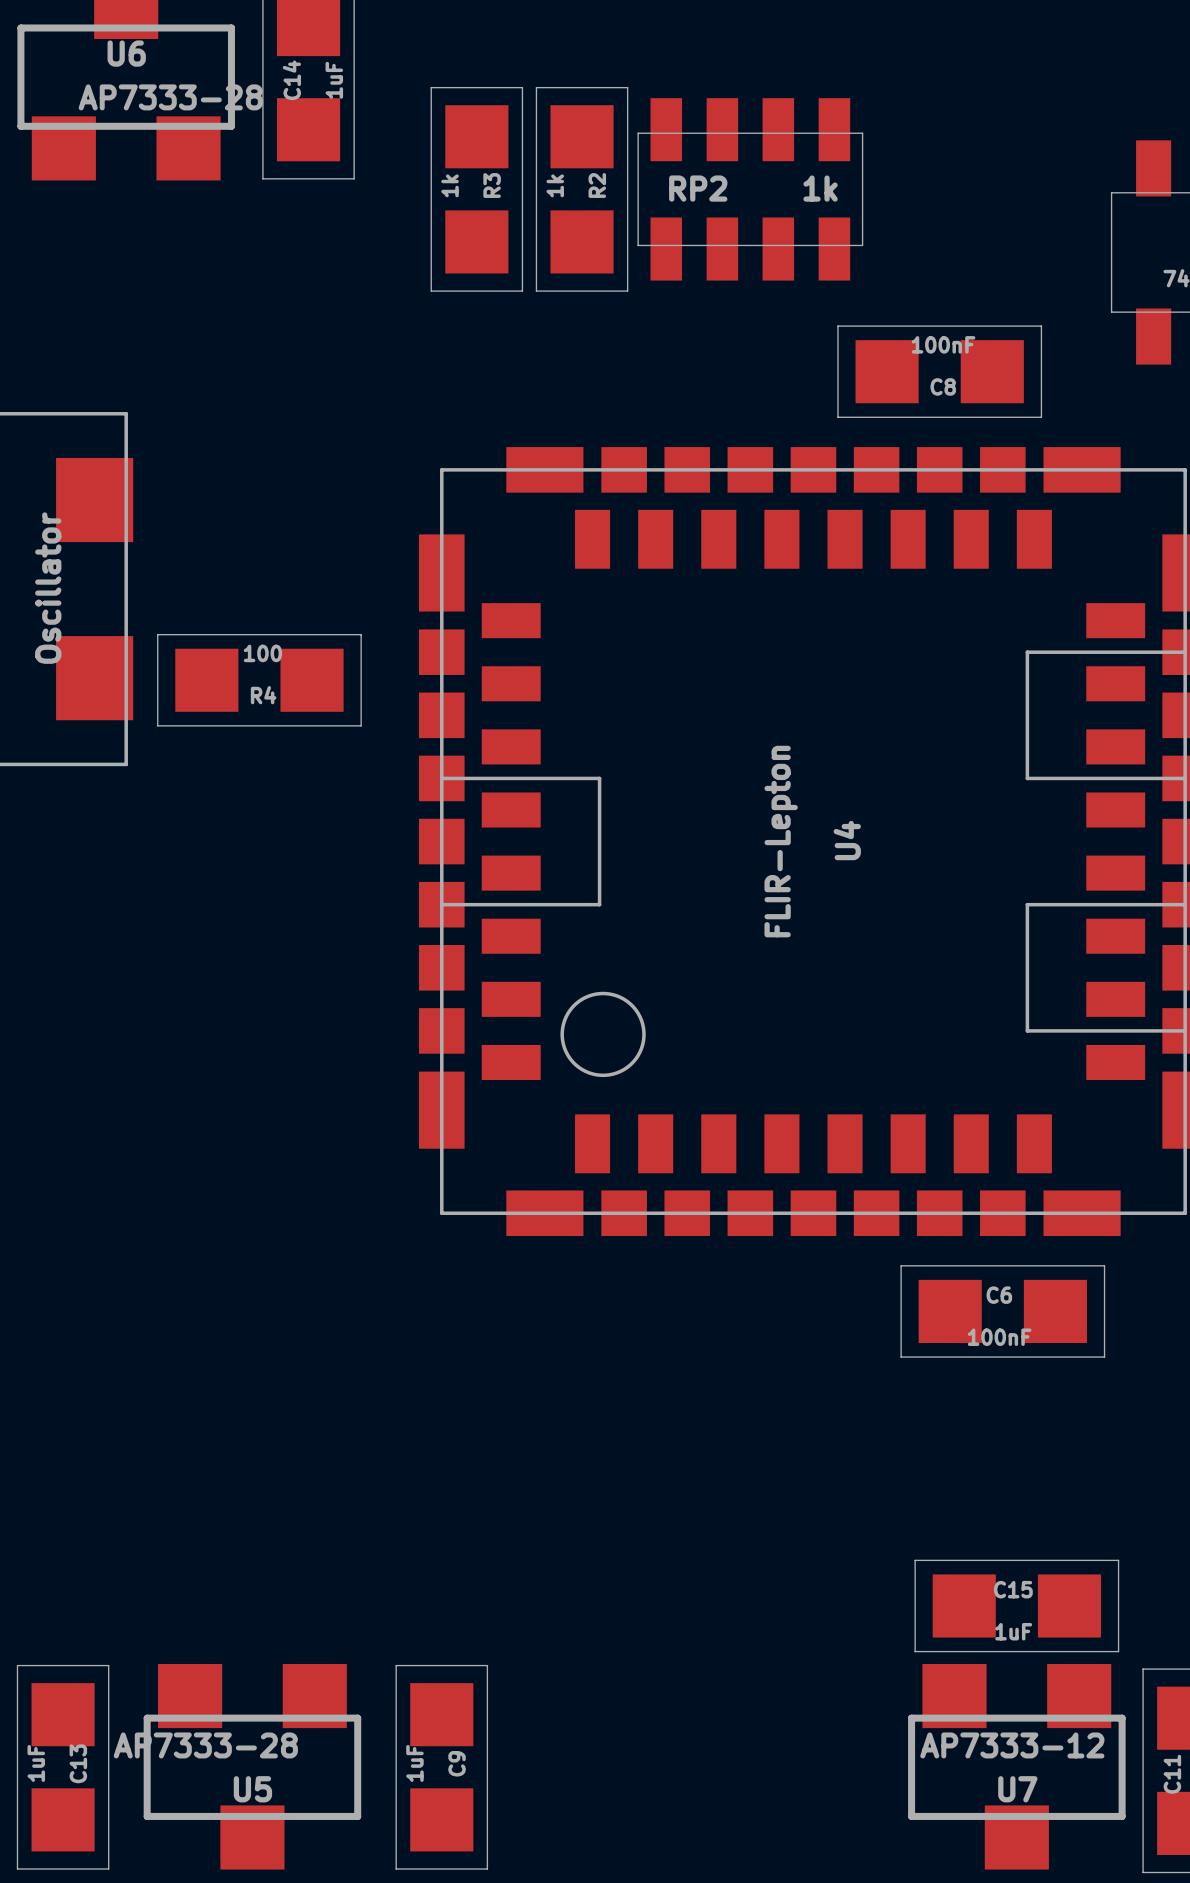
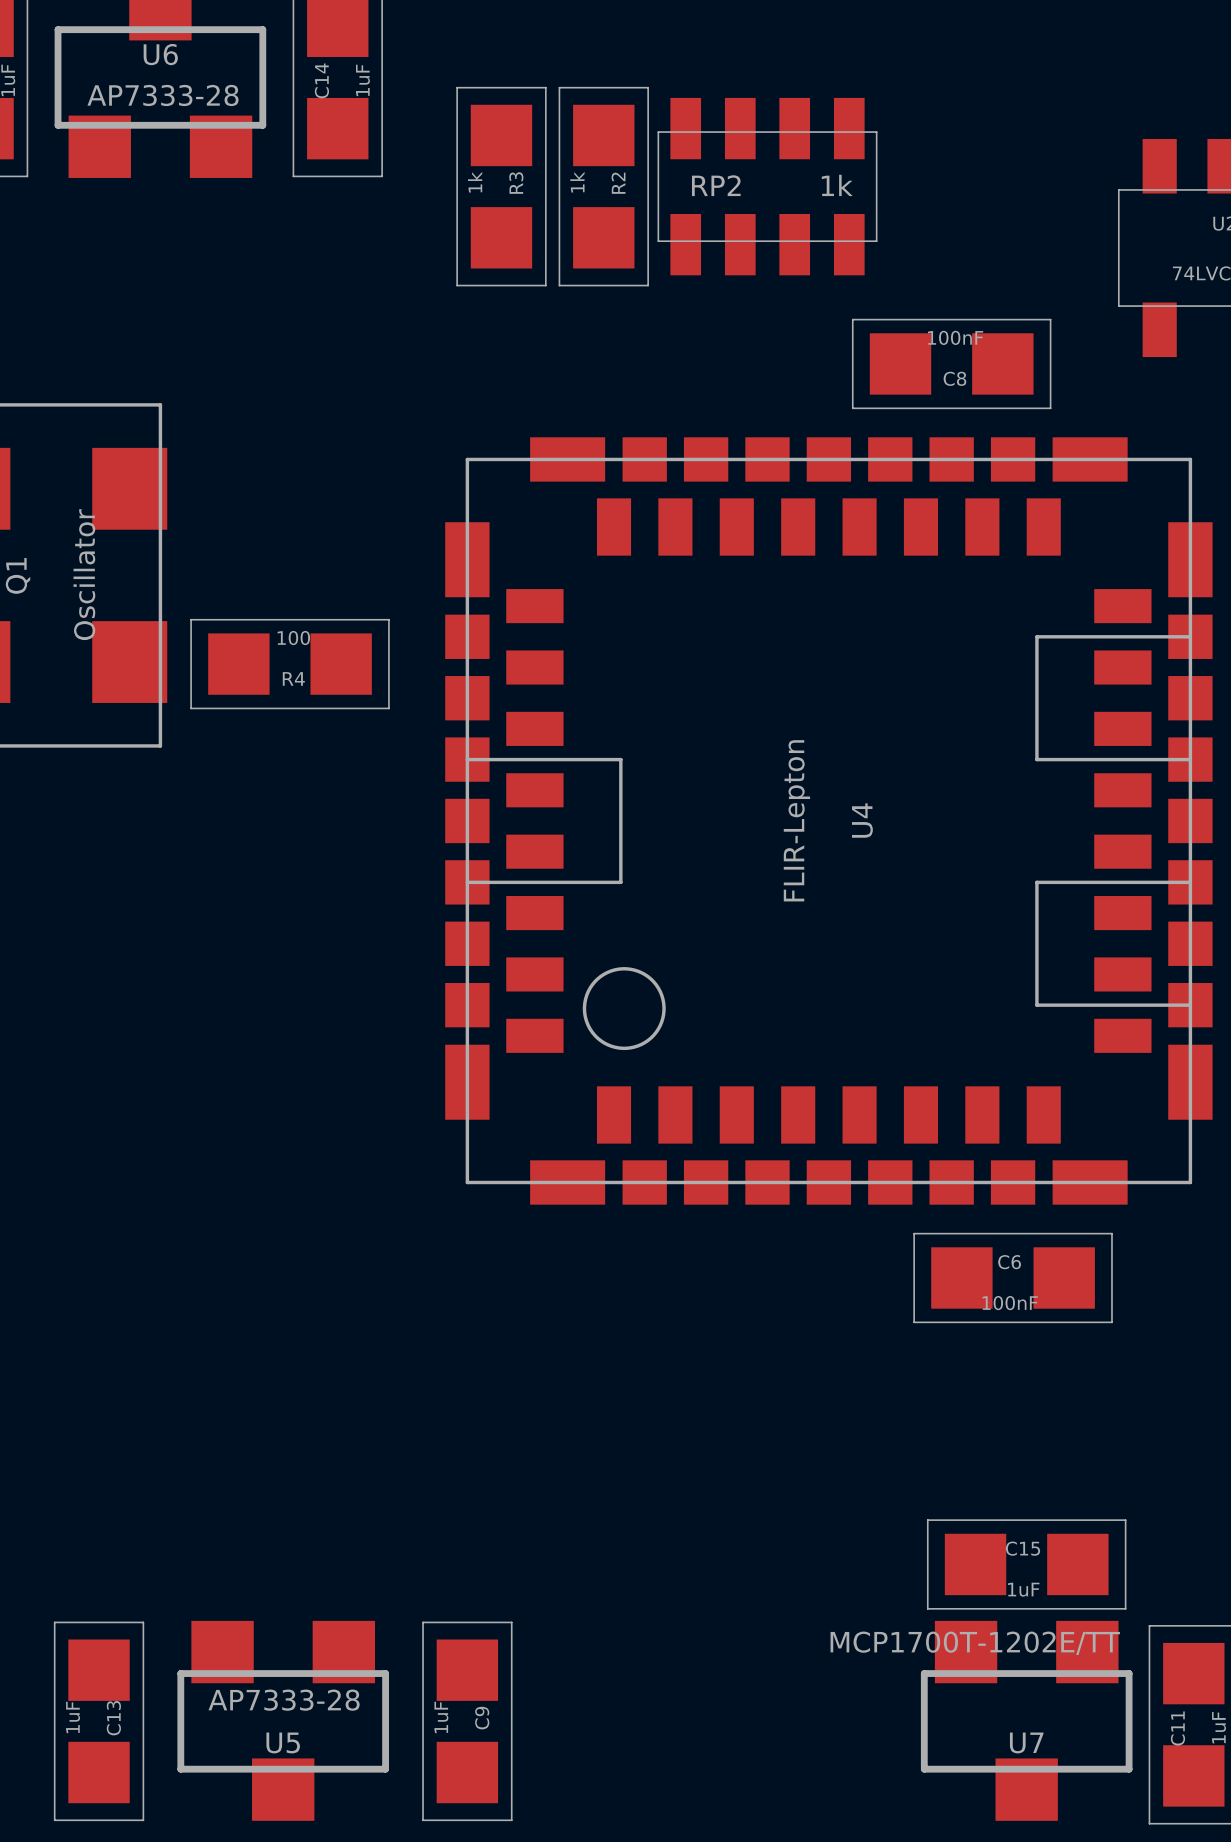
U6 value position: AP7333-28 (170, 97) -> AP7333-28 (162, 95)
U5 value position: AP7333-28 (205, 1745) -> AP7333-28 (284, 1700)
U7 value: AP7333-12 (1012, 1745) -> MCP1700T-1202E/TT (975, 1643)

